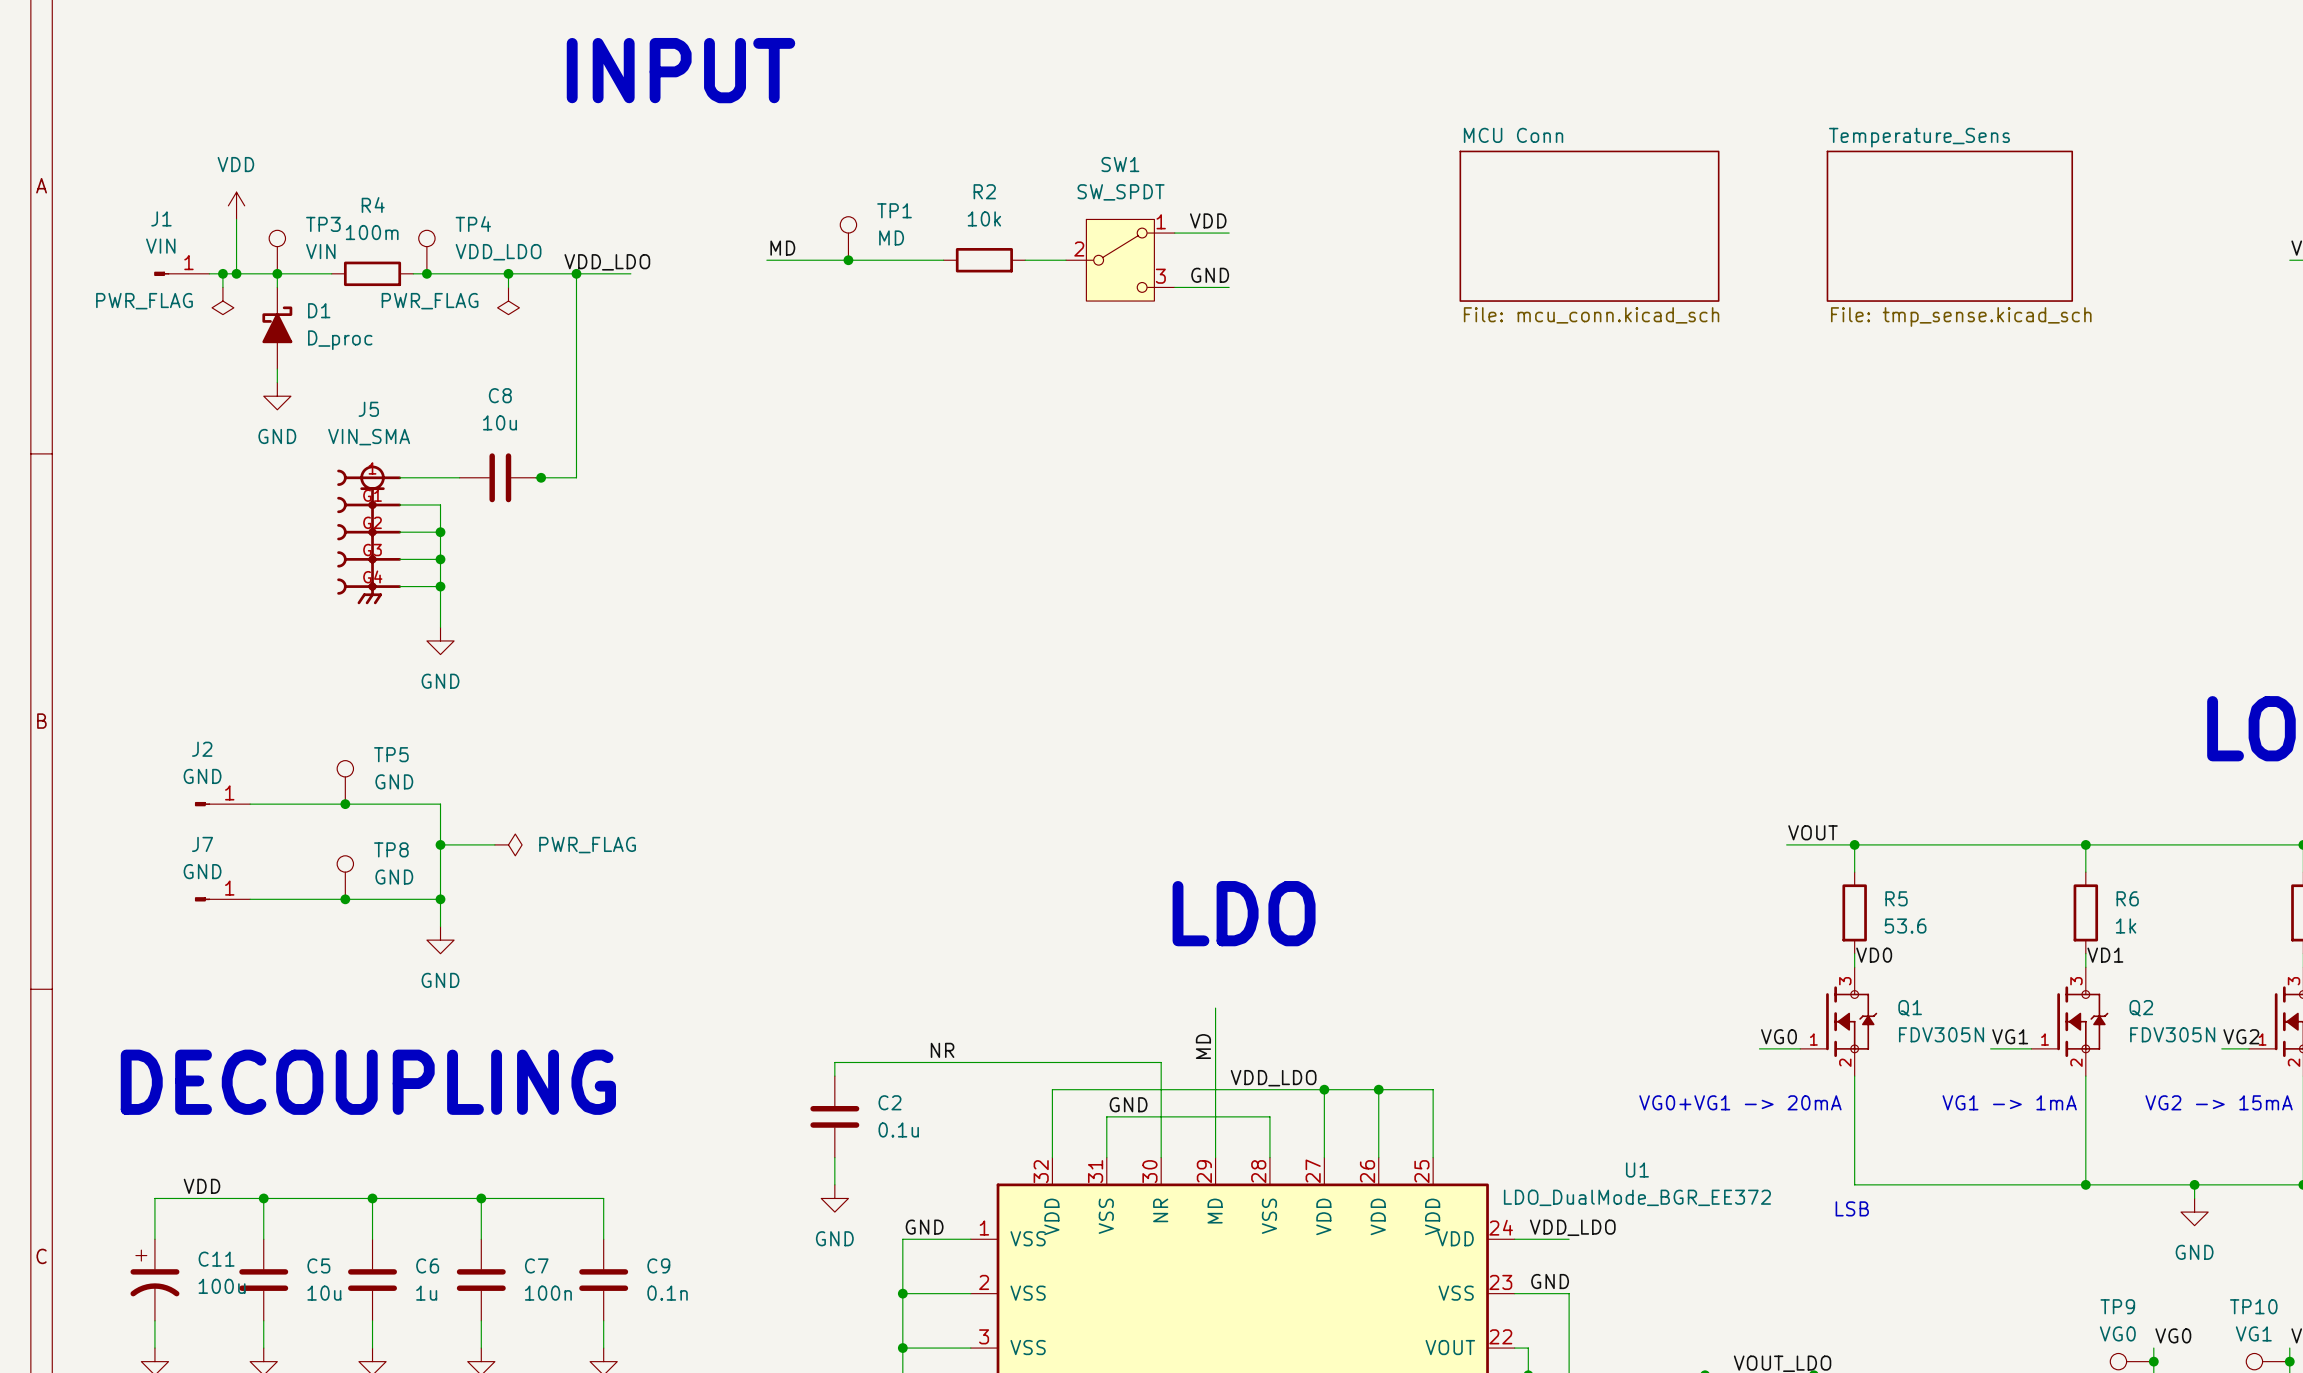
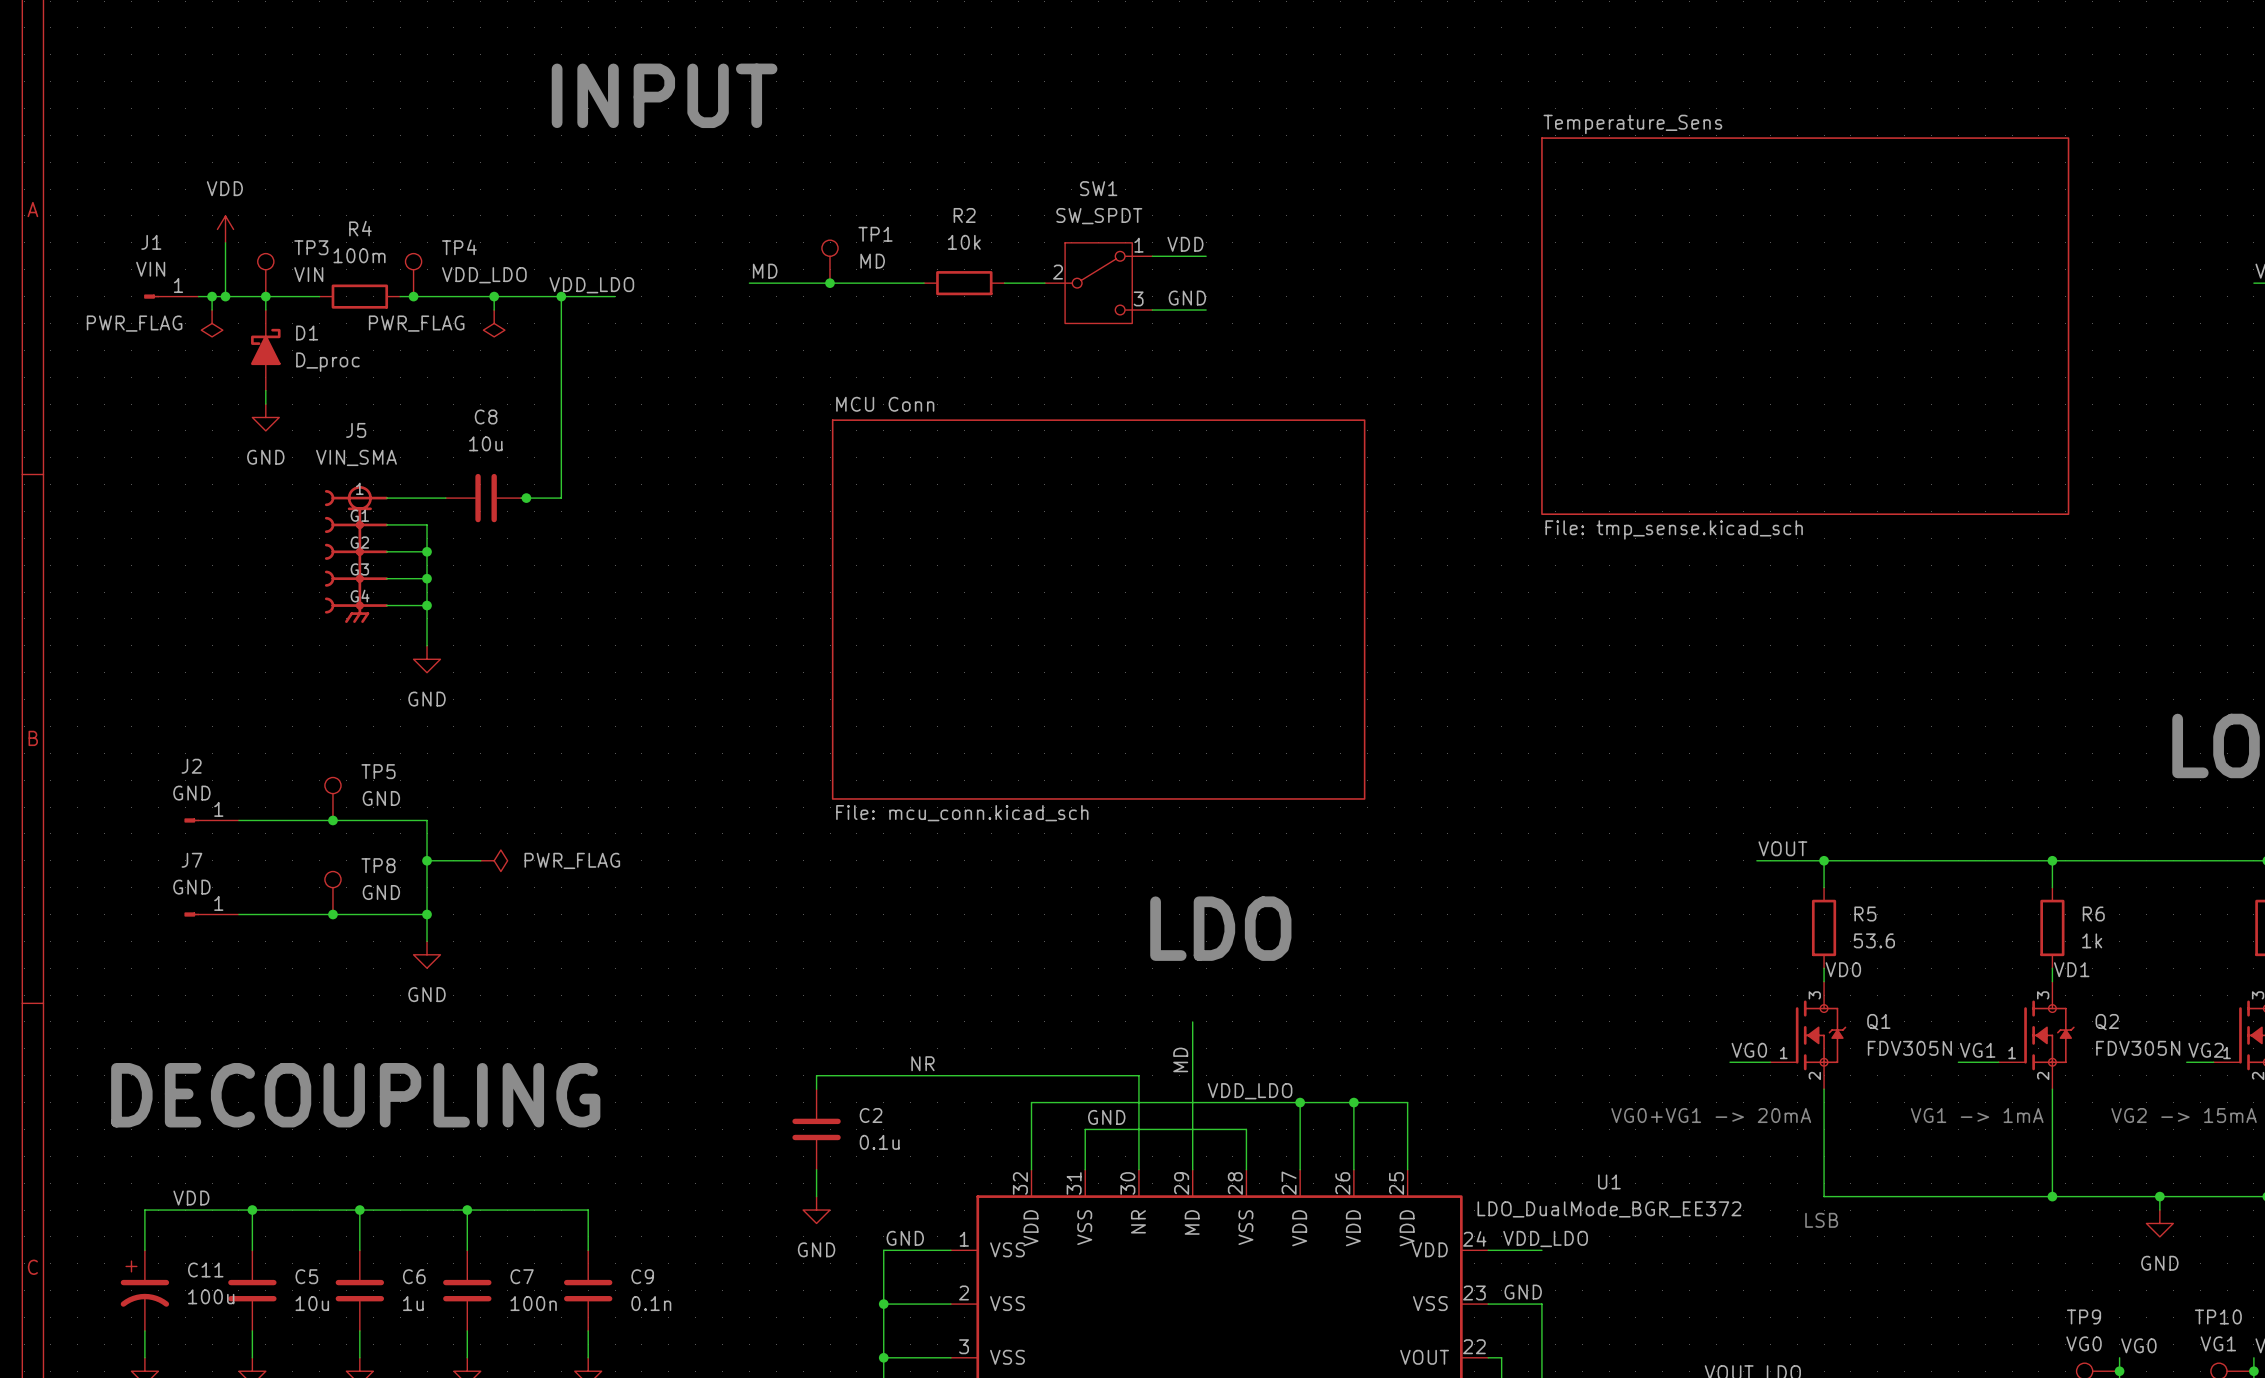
sheet MCU Conn: File: mcu_conn.kicad_sch (1589, 226) -> none
sheet Temperature_Sens: File: tmp_sense.kicad_sch (1949, 226) -> none
sheet Temperature_Sens: none -> File: tmp_sense.kicad_sch (1805, 326)
sheet MCU Conn: none -> File: mcu_conn.kicad_sch (1098, 609)

